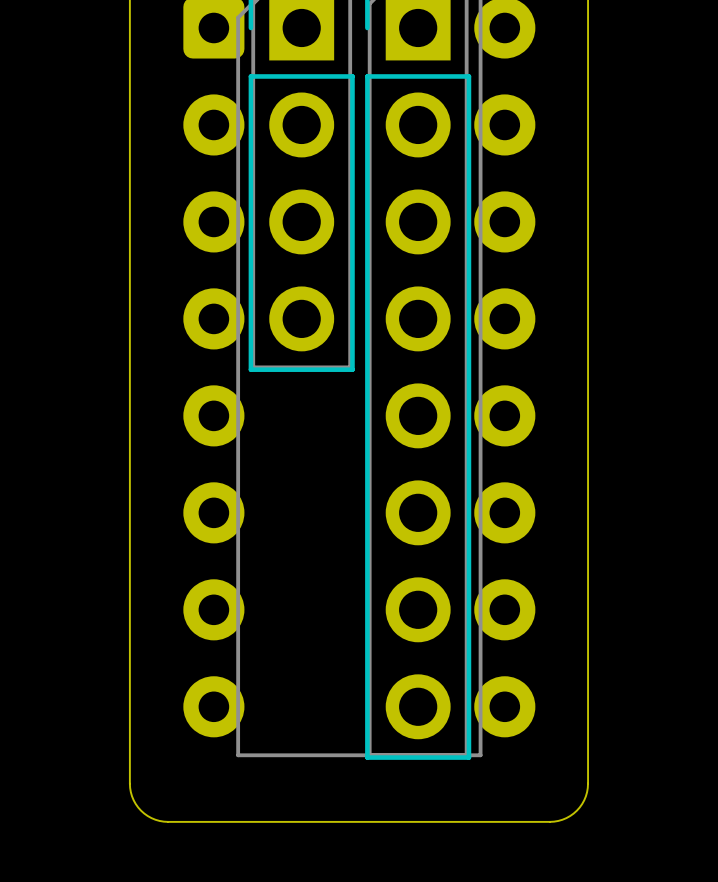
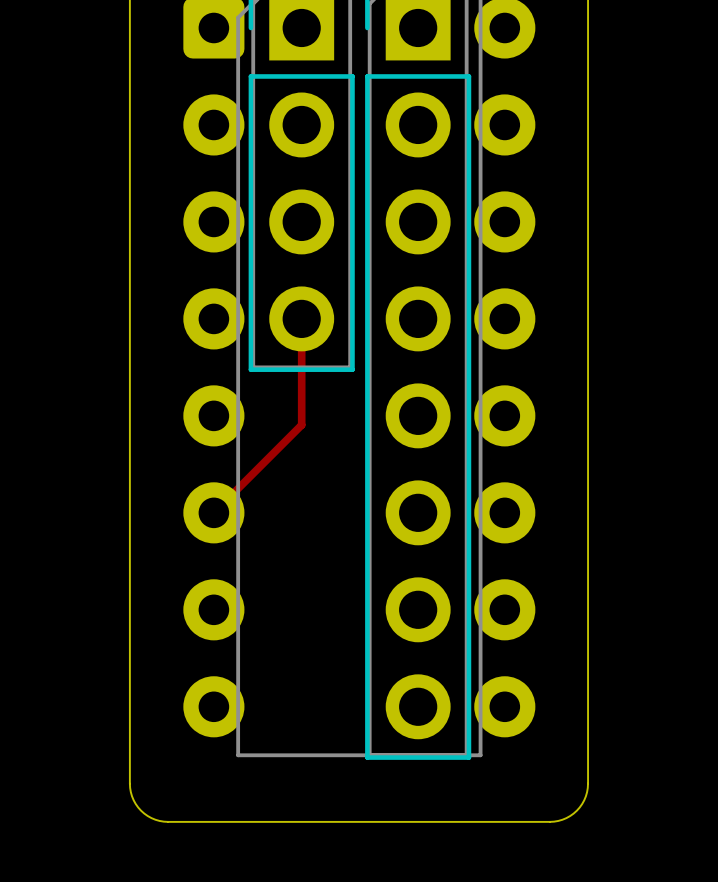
track: none -> (301, 318) (301, 425) (213, 512)

